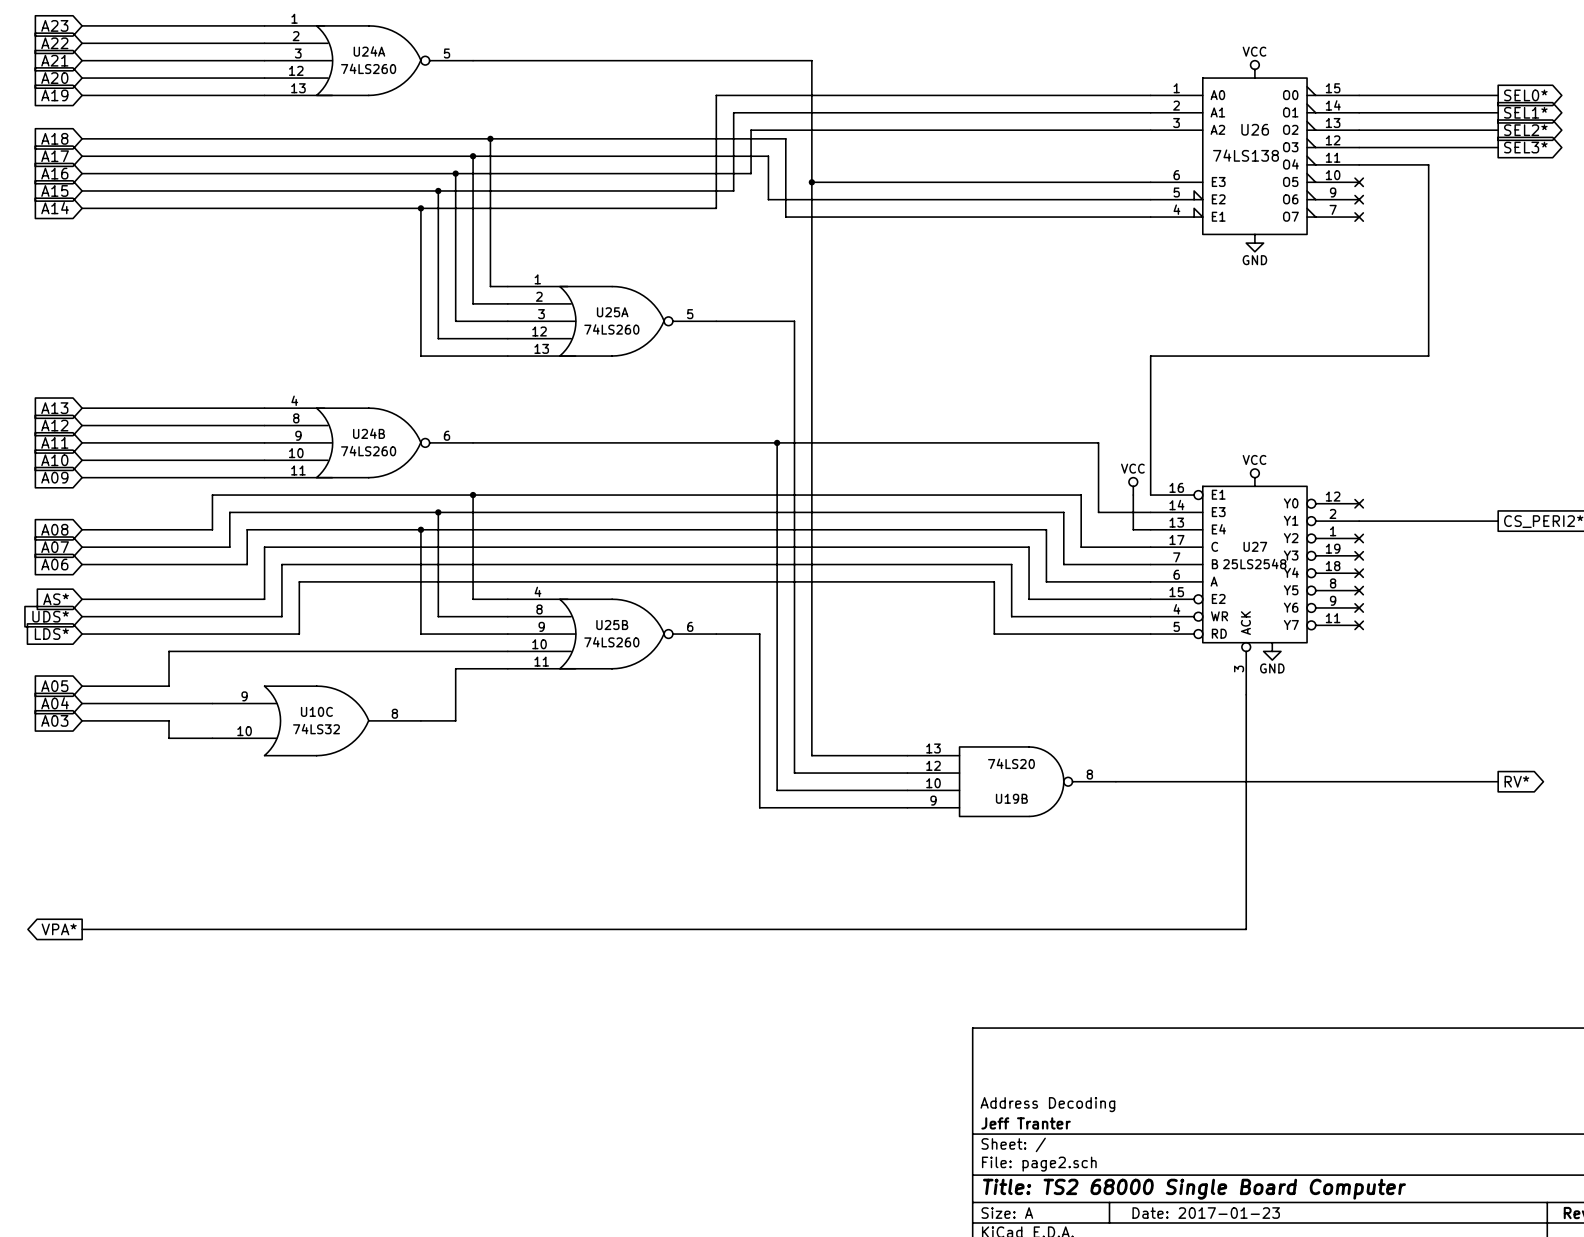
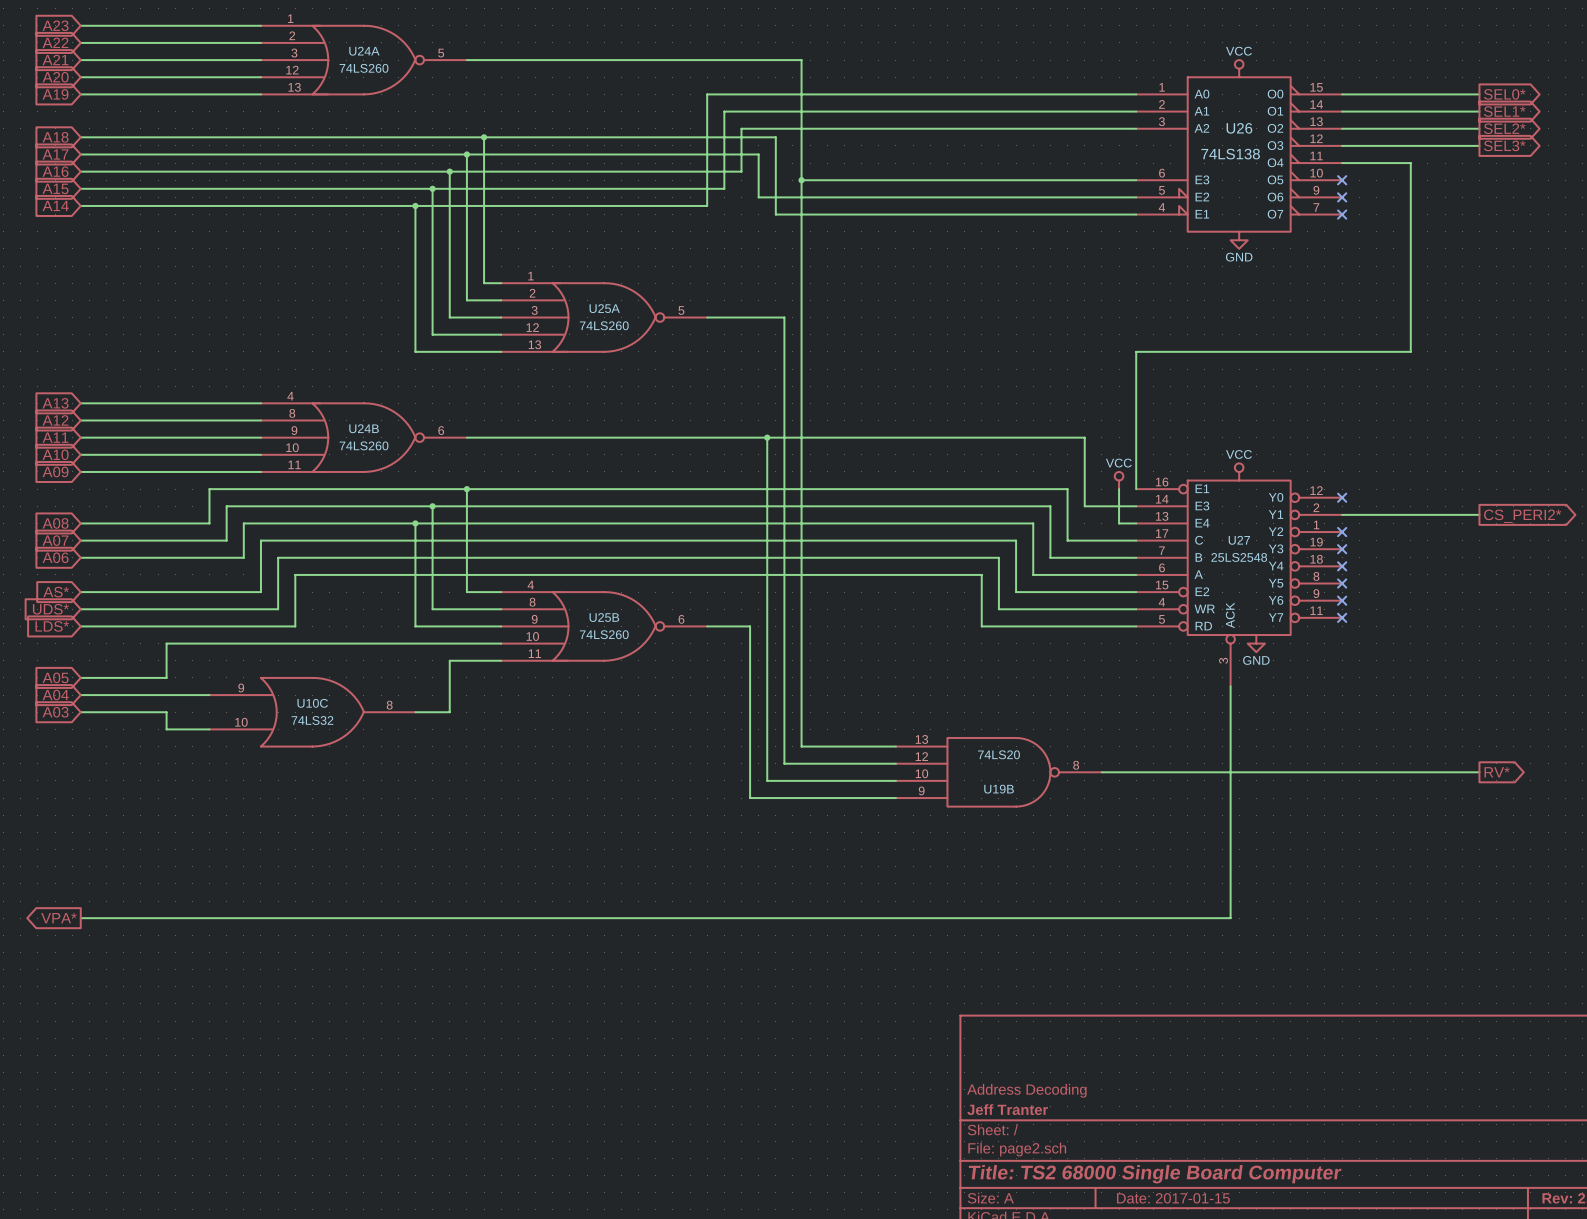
title block: Date: 2017-01-23 (1206, 1213) -> Date: 2017-01-15 (1173, 1198)

